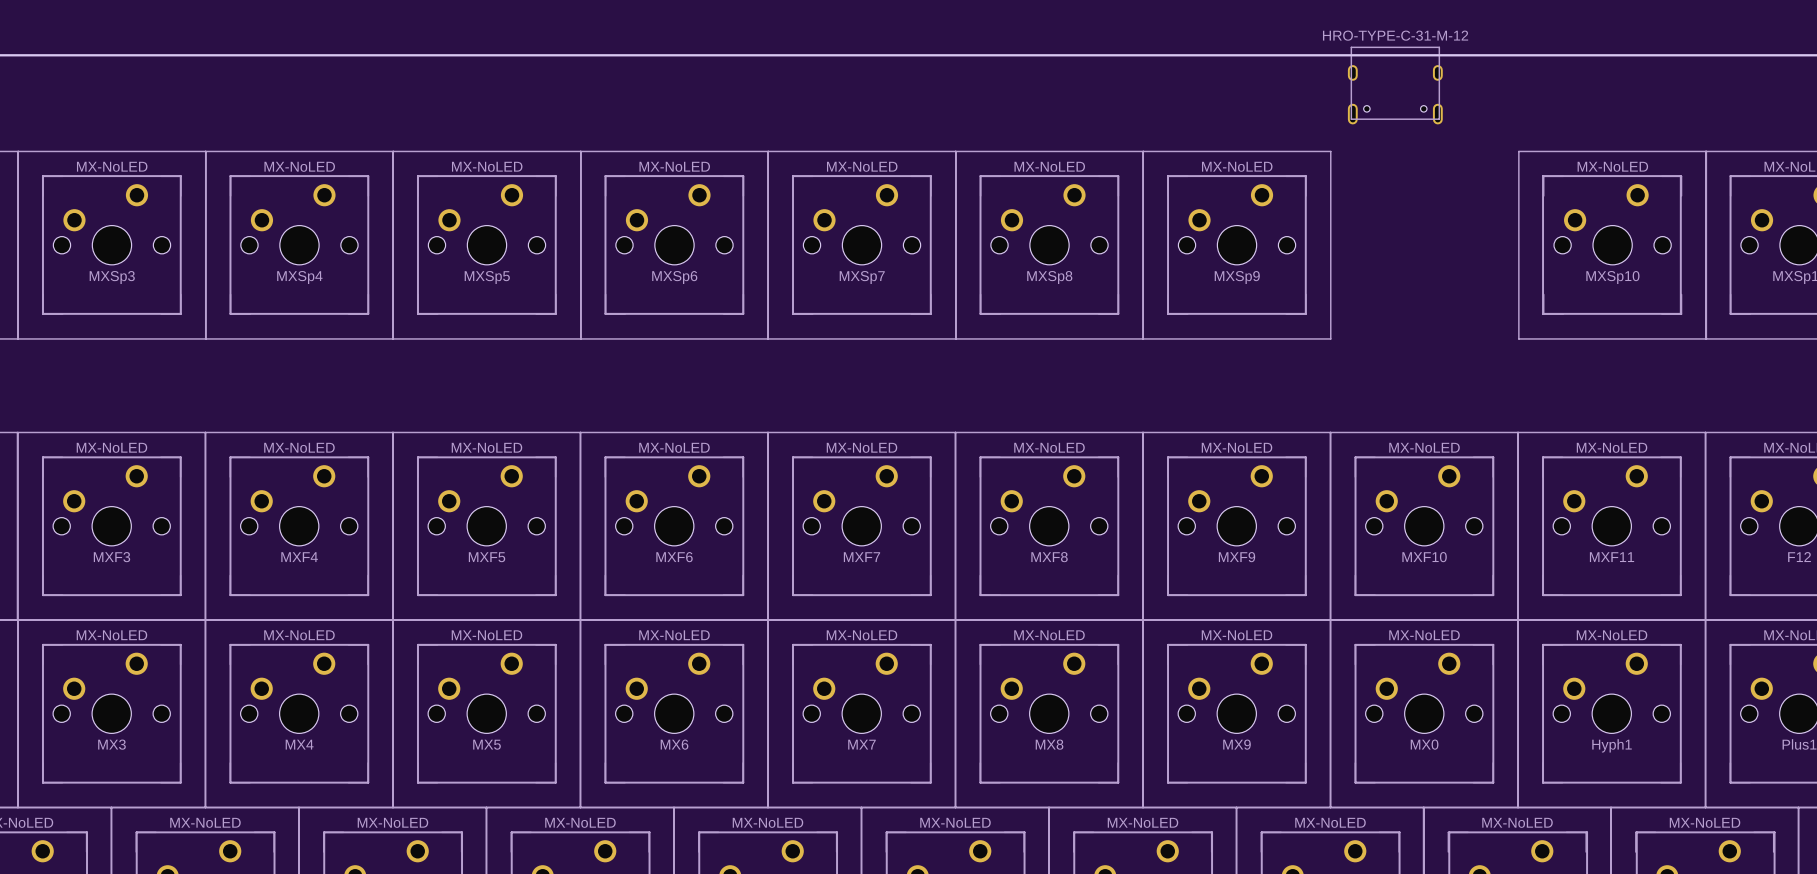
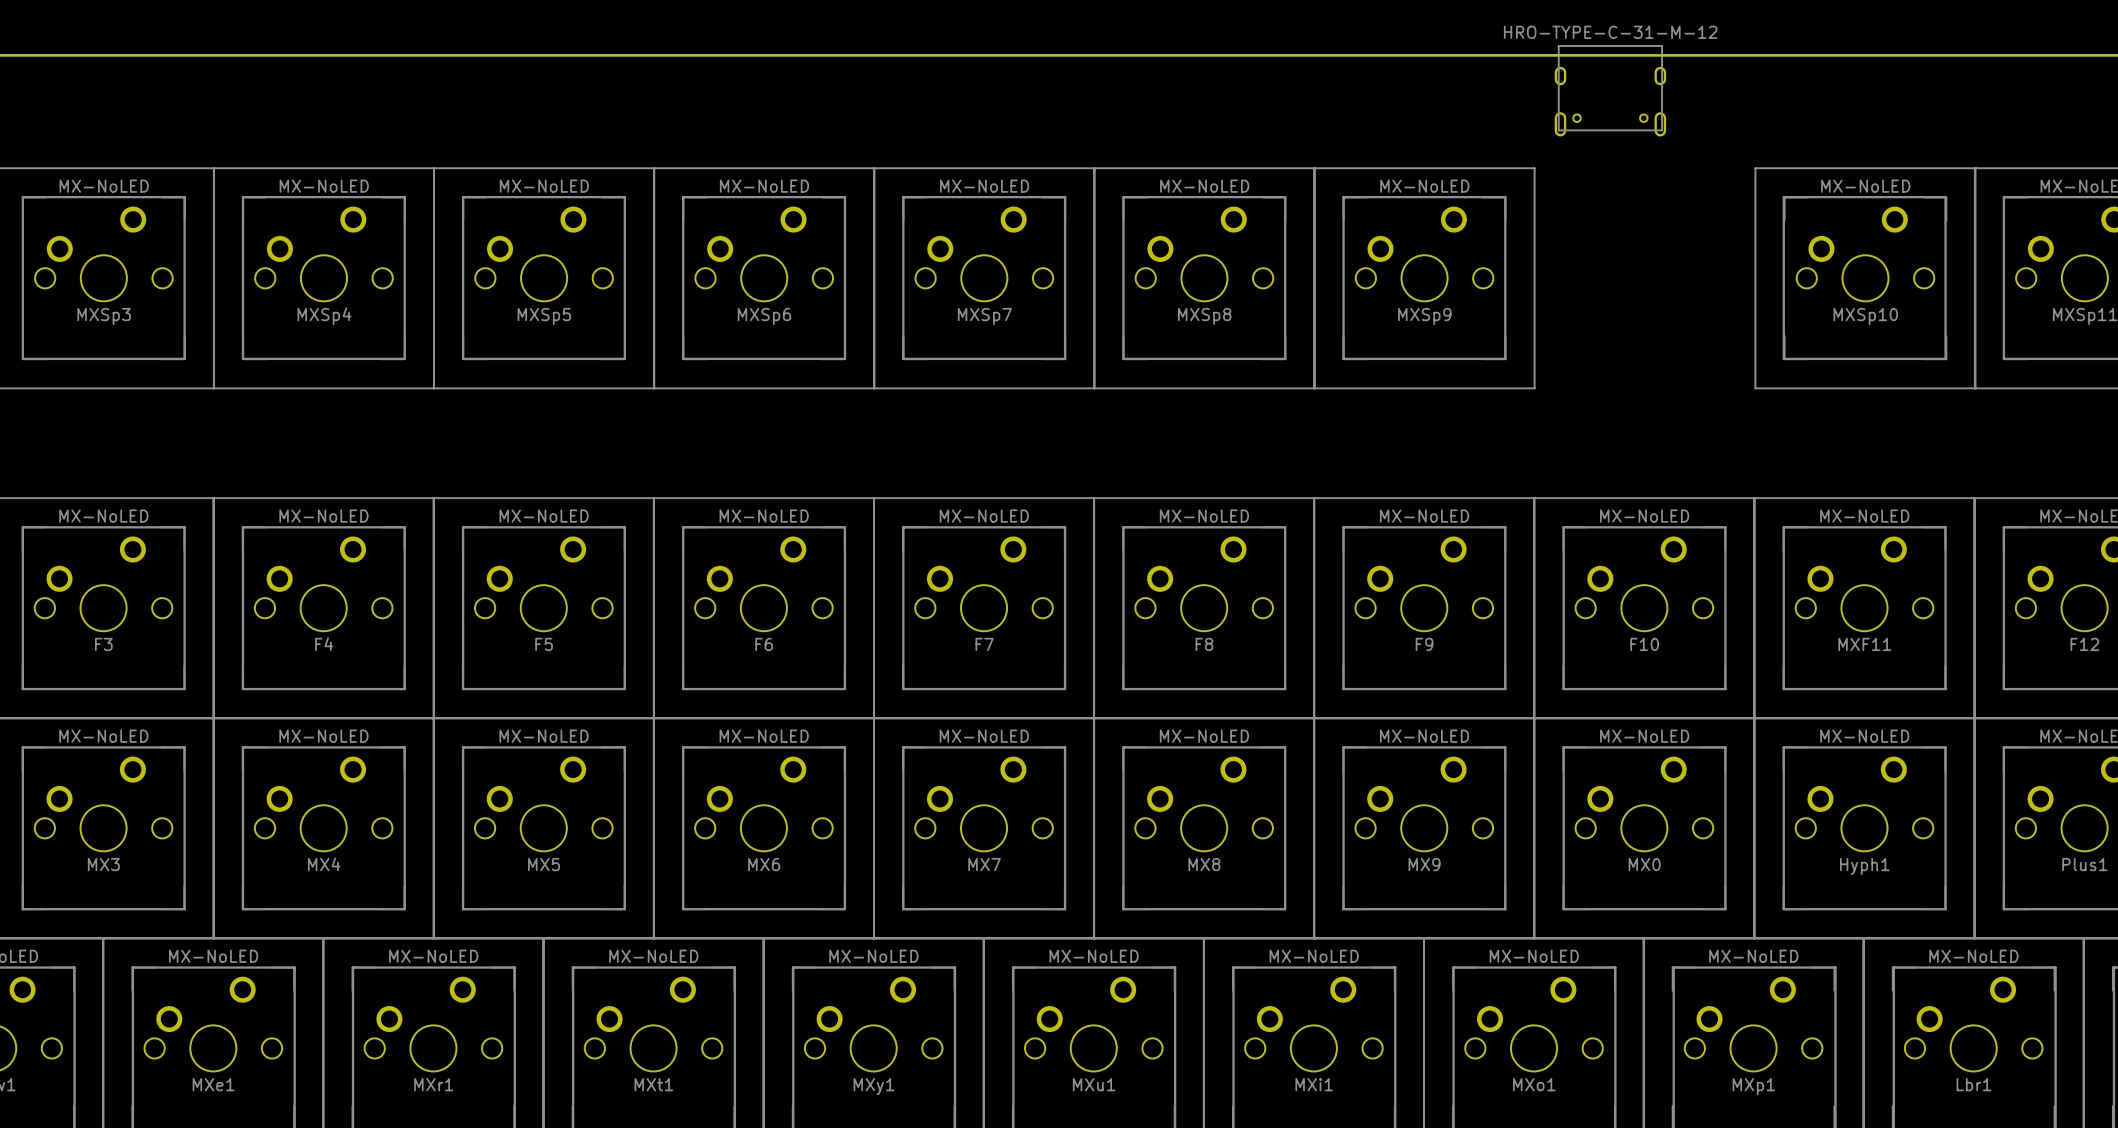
MXF3 name: MXF3 (111, 557) -> F3 (103, 644)
MXF4 name: MXF4 (299, 557) -> F4 (324, 644)
MXF5 name: MXF5 (487, 557) -> F5 (544, 644)
MXF6 name: MXF6 (674, 557) -> F6 (764, 644)
MXF7 name: MXF7 (861, 557) -> F7 (984, 644)
MXF8 name: MXF8 (1049, 557) -> F8 (1204, 644)
MXF9 name: MXF9 (1237, 557) -> F9 (1424, 644)
MXF10 name: MXF10 (1424, 557) -> F10 (1644, 644)

